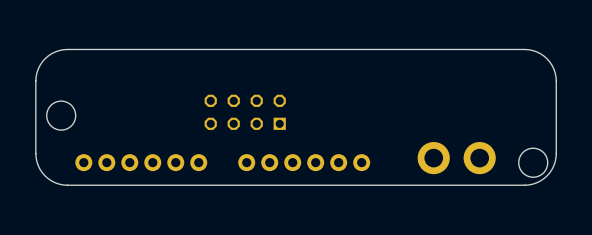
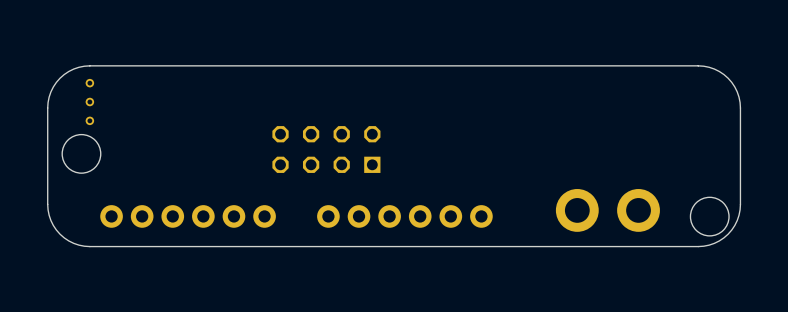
part: none -> (89, 102)

